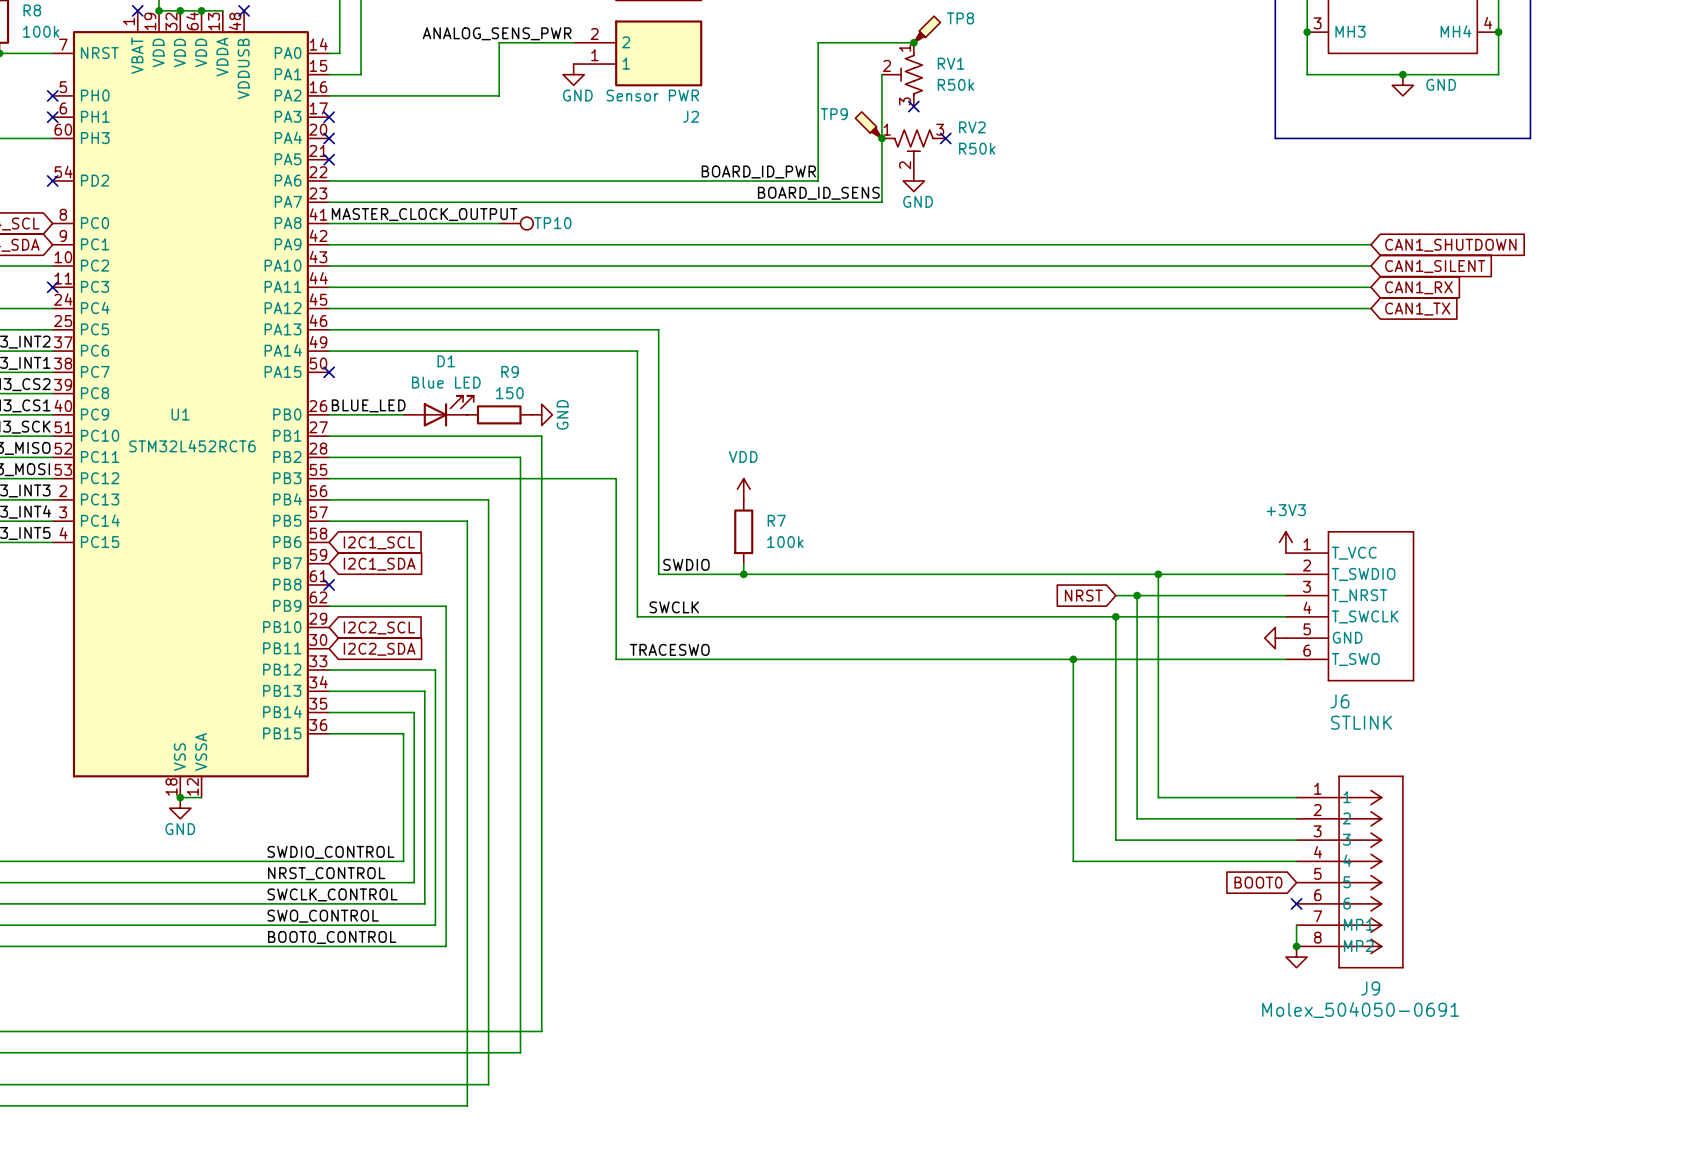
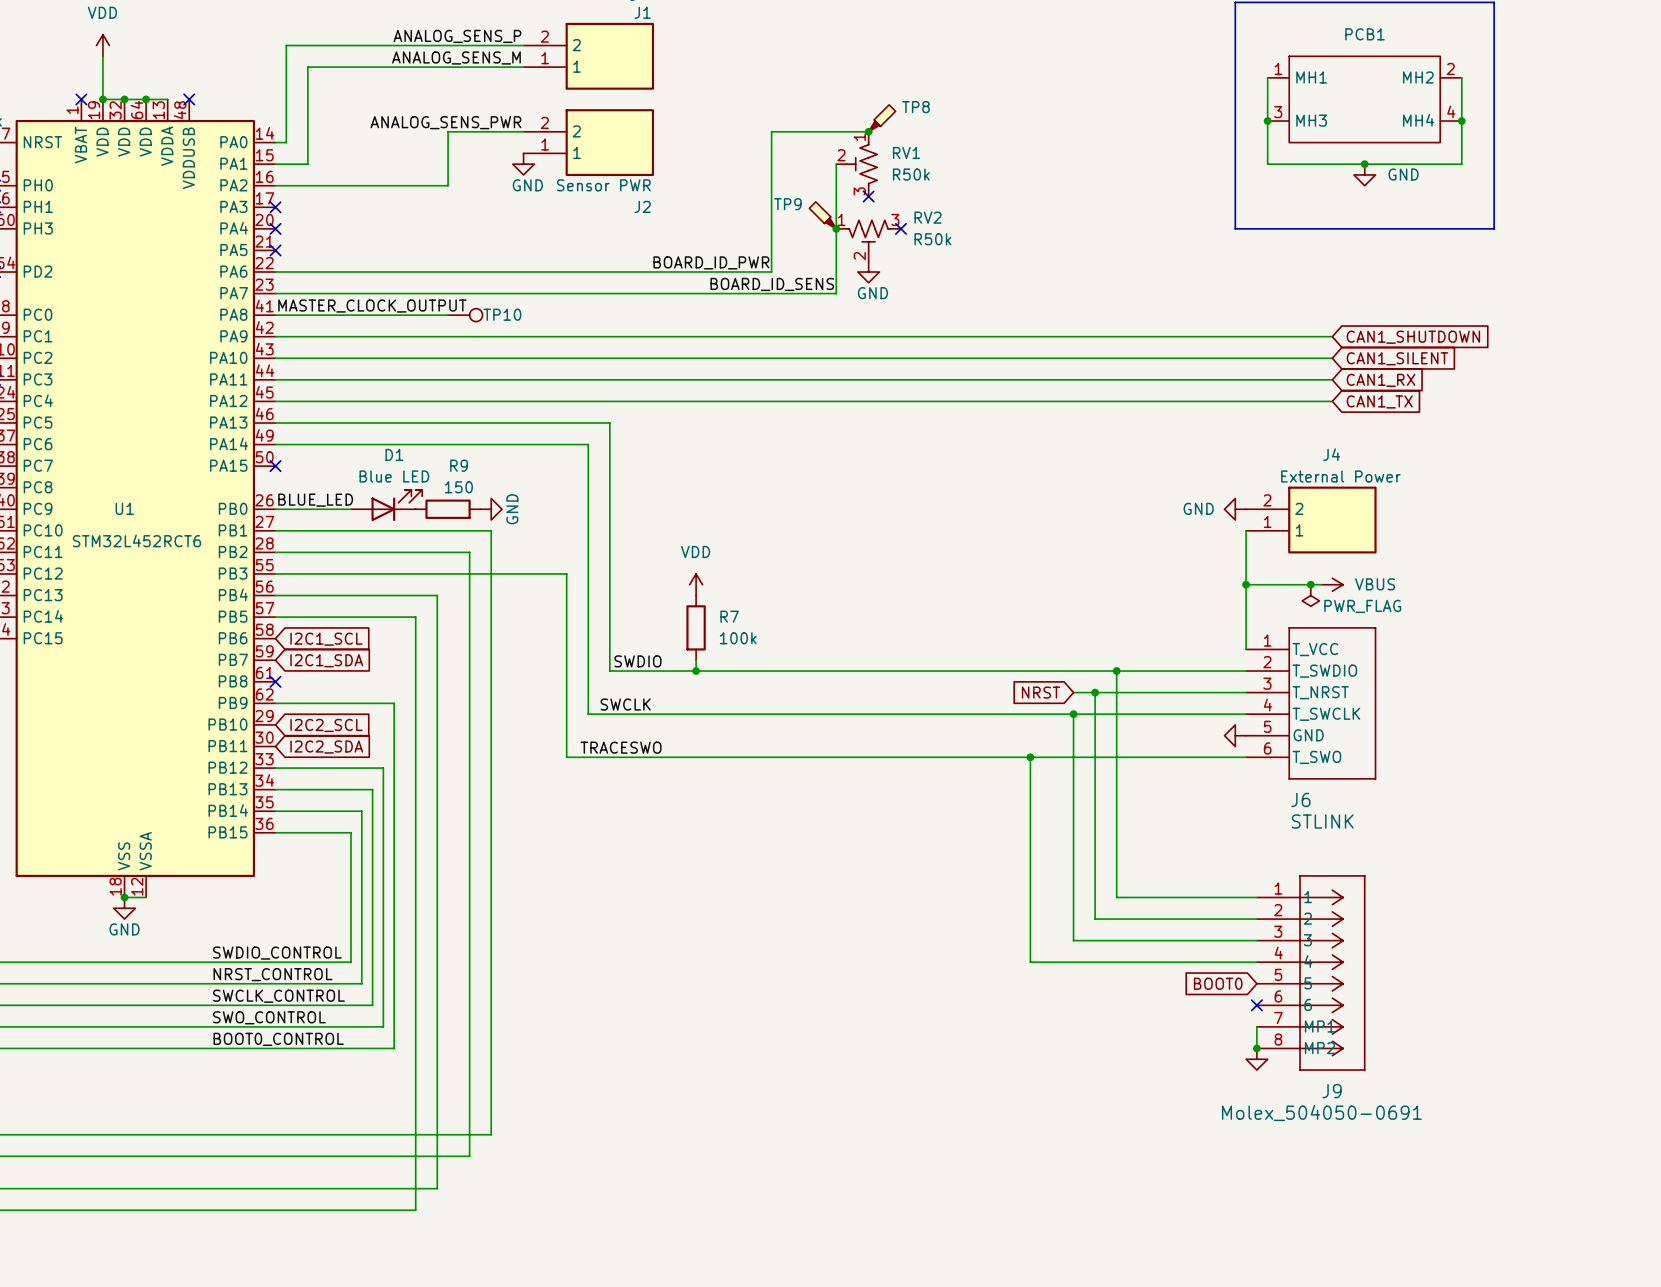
power symbol: none -> GND (1235, 509)
J4: none -> External Power (1311, 520)
wire: none -> (1246, 530) (1246, 649)
wire: none -> (1246, 584) (1321, 584)
junction: none -> (1246, 584)
junction: none -> (1310, 584)
power symbol: none -> VBUS (1332, 584)
power symbol: none -> PWR_FLAG (1310, 595)
power symbol: +3V3 (1285, 542) -> none

